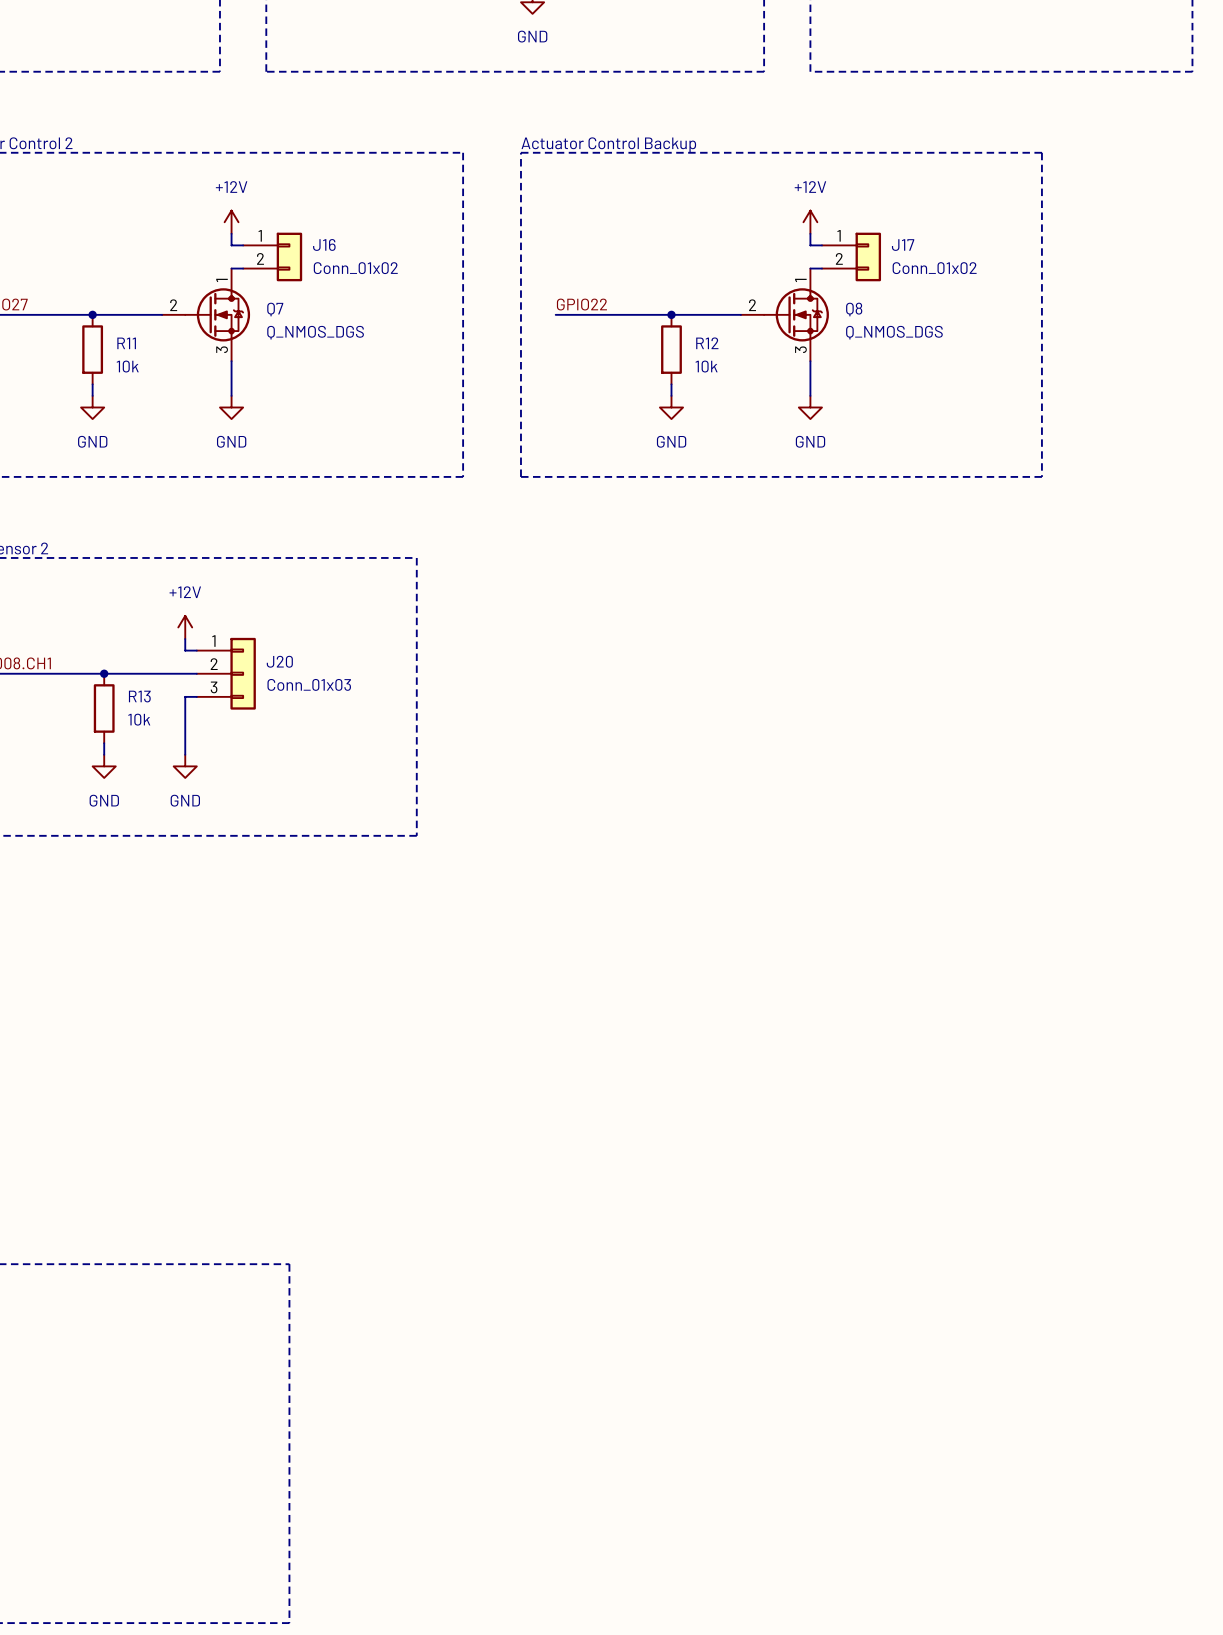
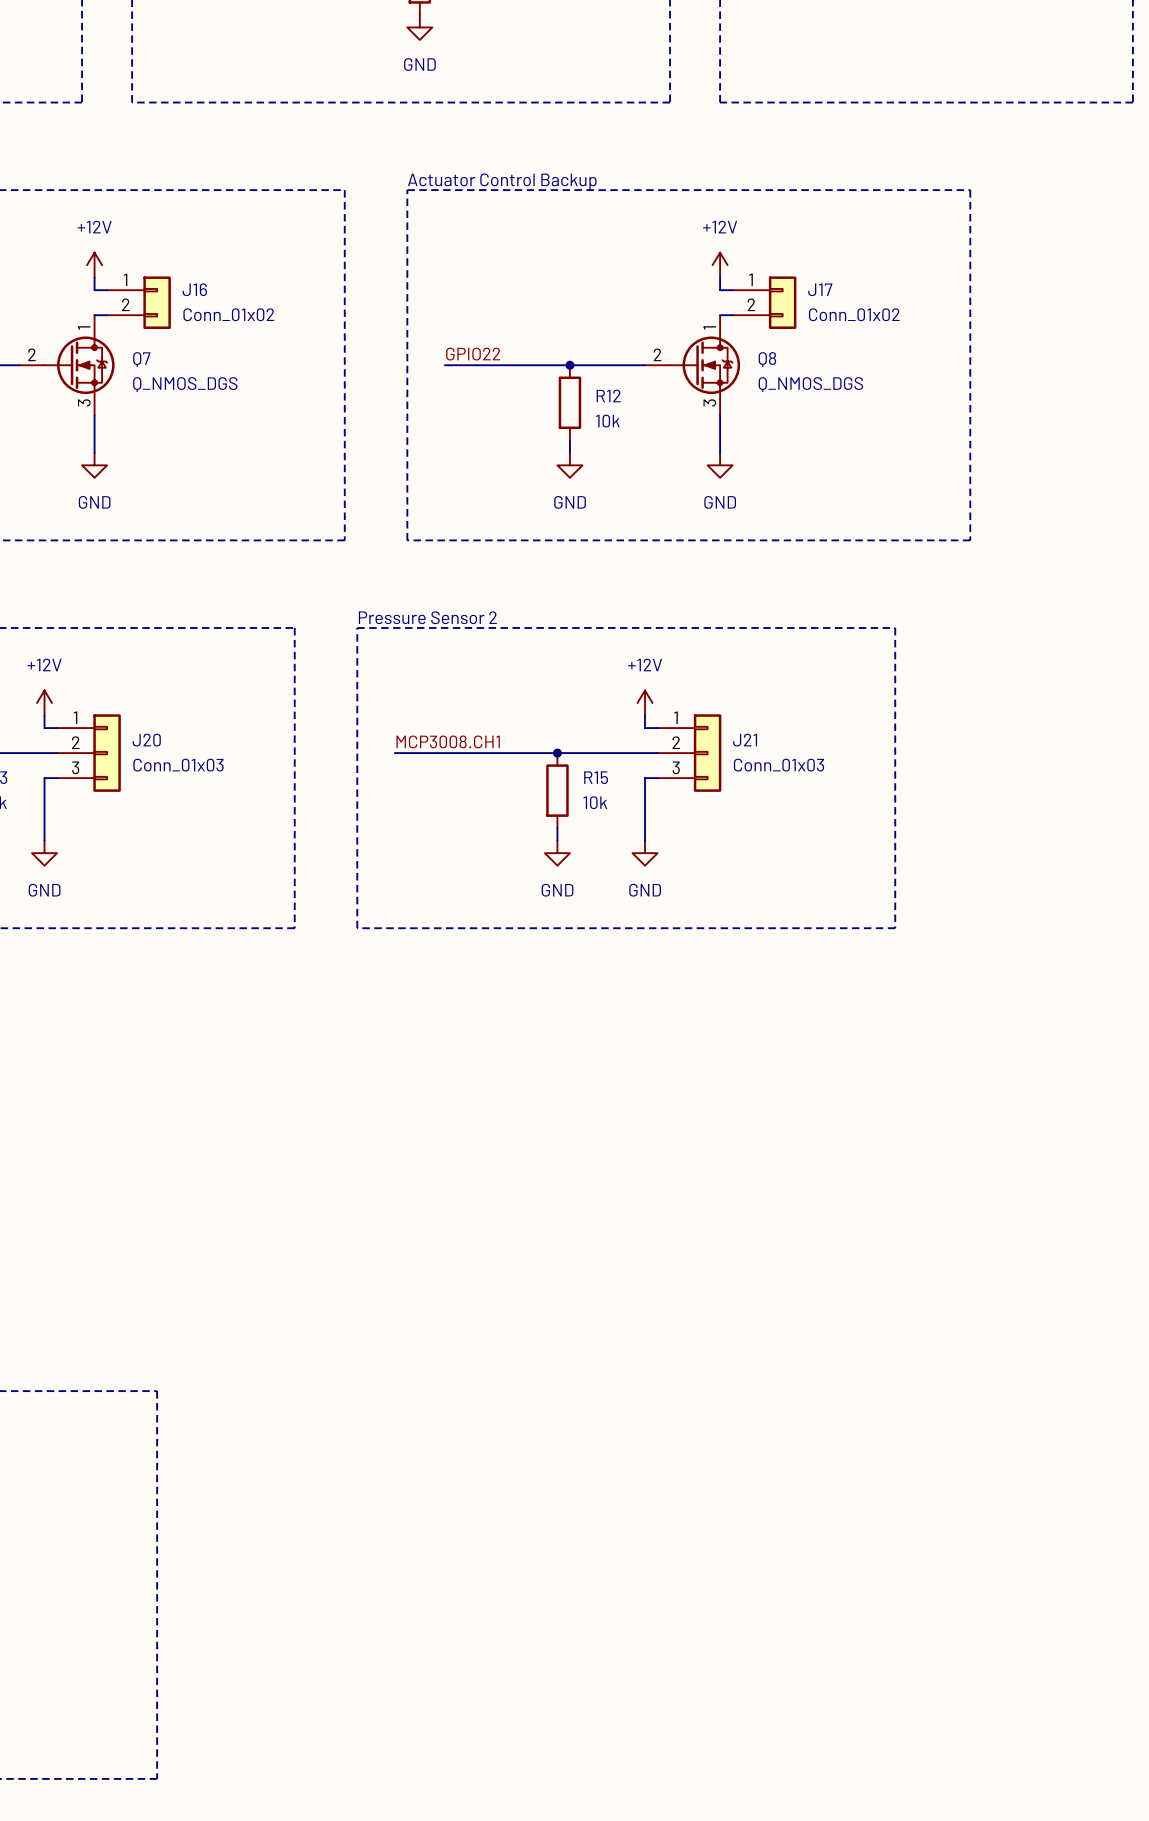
text: none -> Pressure Sensor 2 (427, 617)
line: none -> (357, 627) (895, 627) (895, 928) (357, 928) (357, 627)
power symbol: none -> +12V (645, 703)
wire: none -> (645, 715) (645, 728) (657, 728)
label: none -> MCP3008.CH1 (448, 741)
wire: none -> (394, 753) (657, 753)
junction: none -> (557, 753)
J21: none -> Conn_01x03 (689, 753)
wire: none -> (657, 778) (645, 778) (645, 840)
R15: none -> 10k (557, 790)
wire: none -> (557, 828) (557, 840)
power symbol: none -> GND (557, 853)
power symbol: none -> GND (645, 853)

